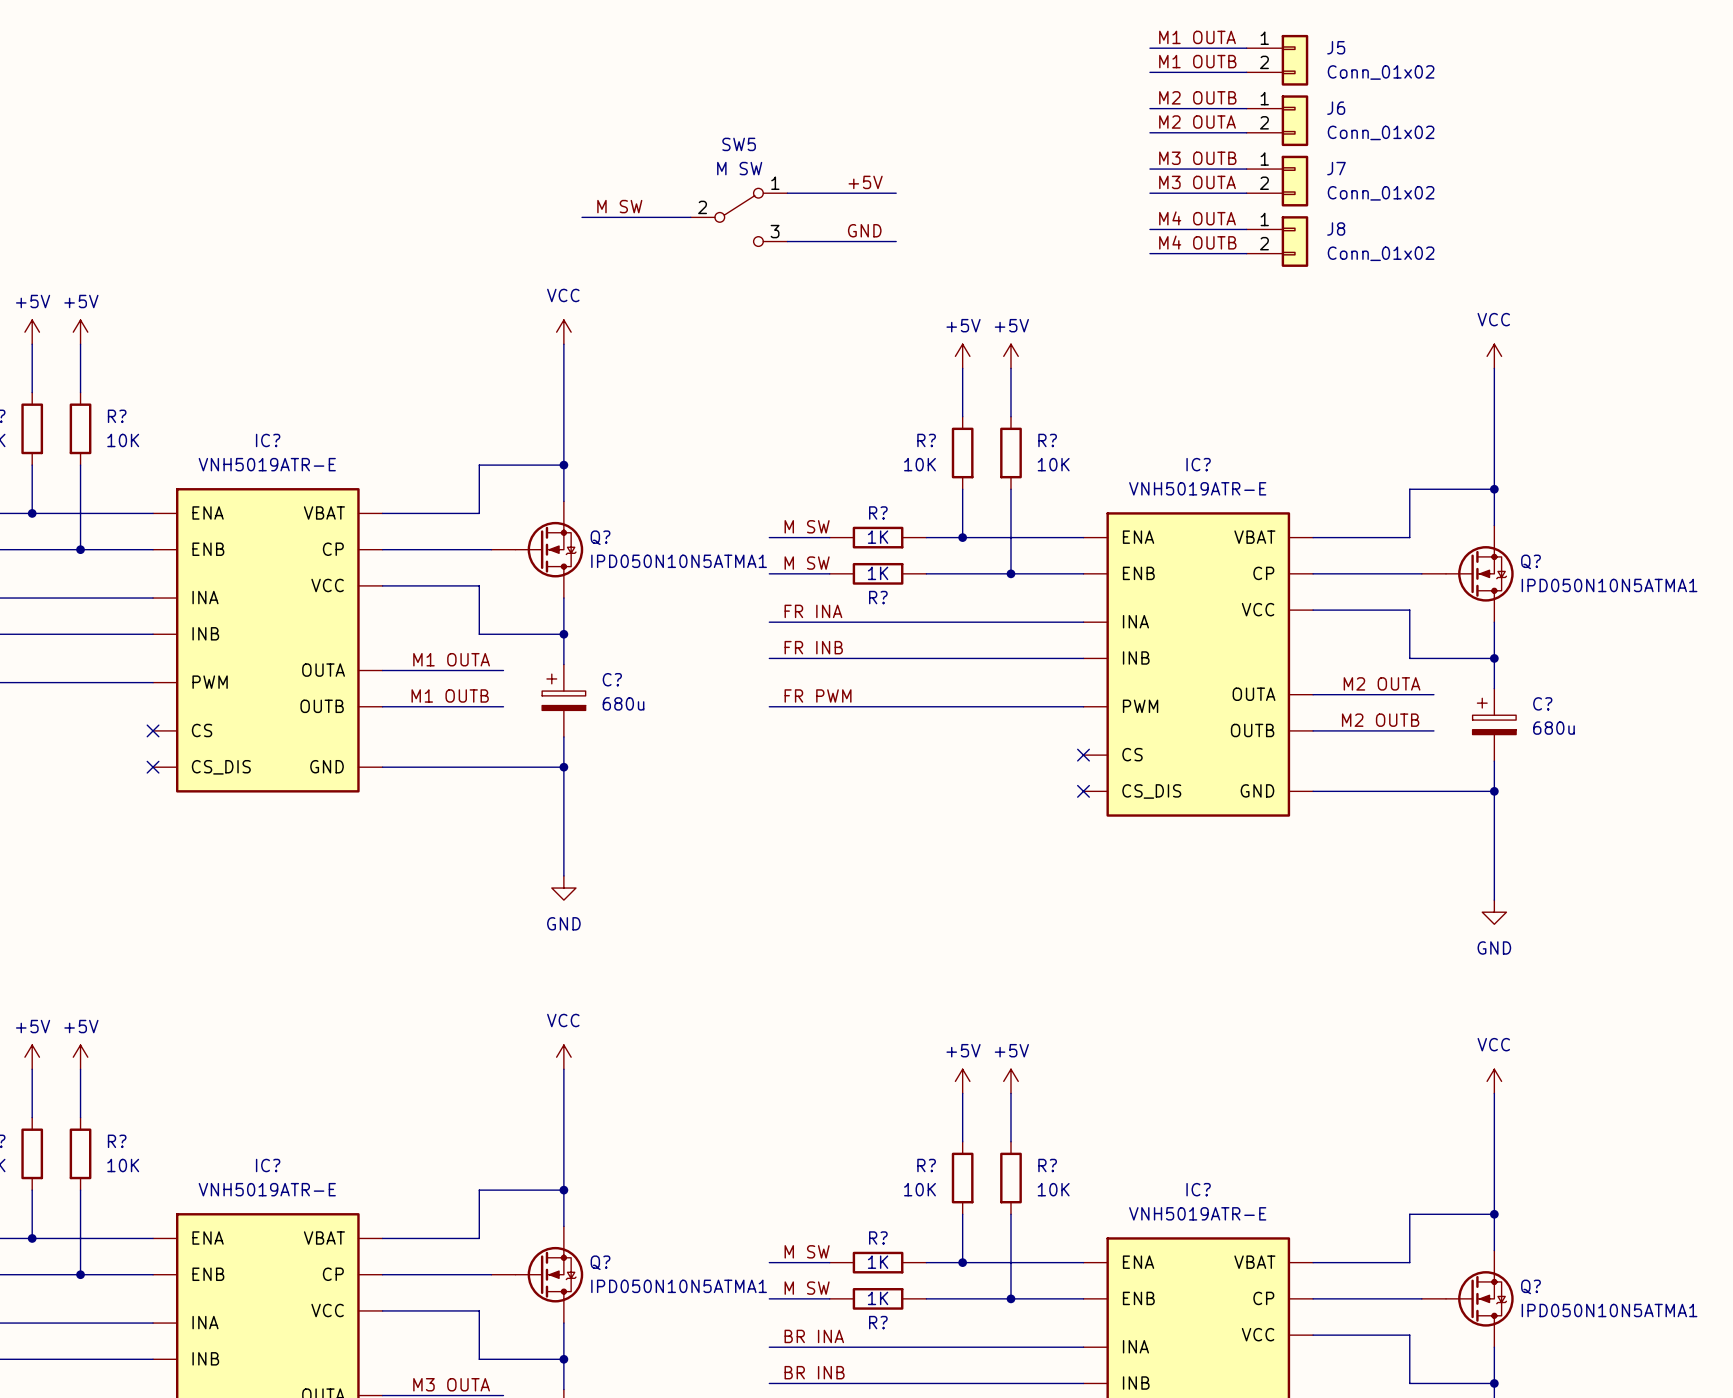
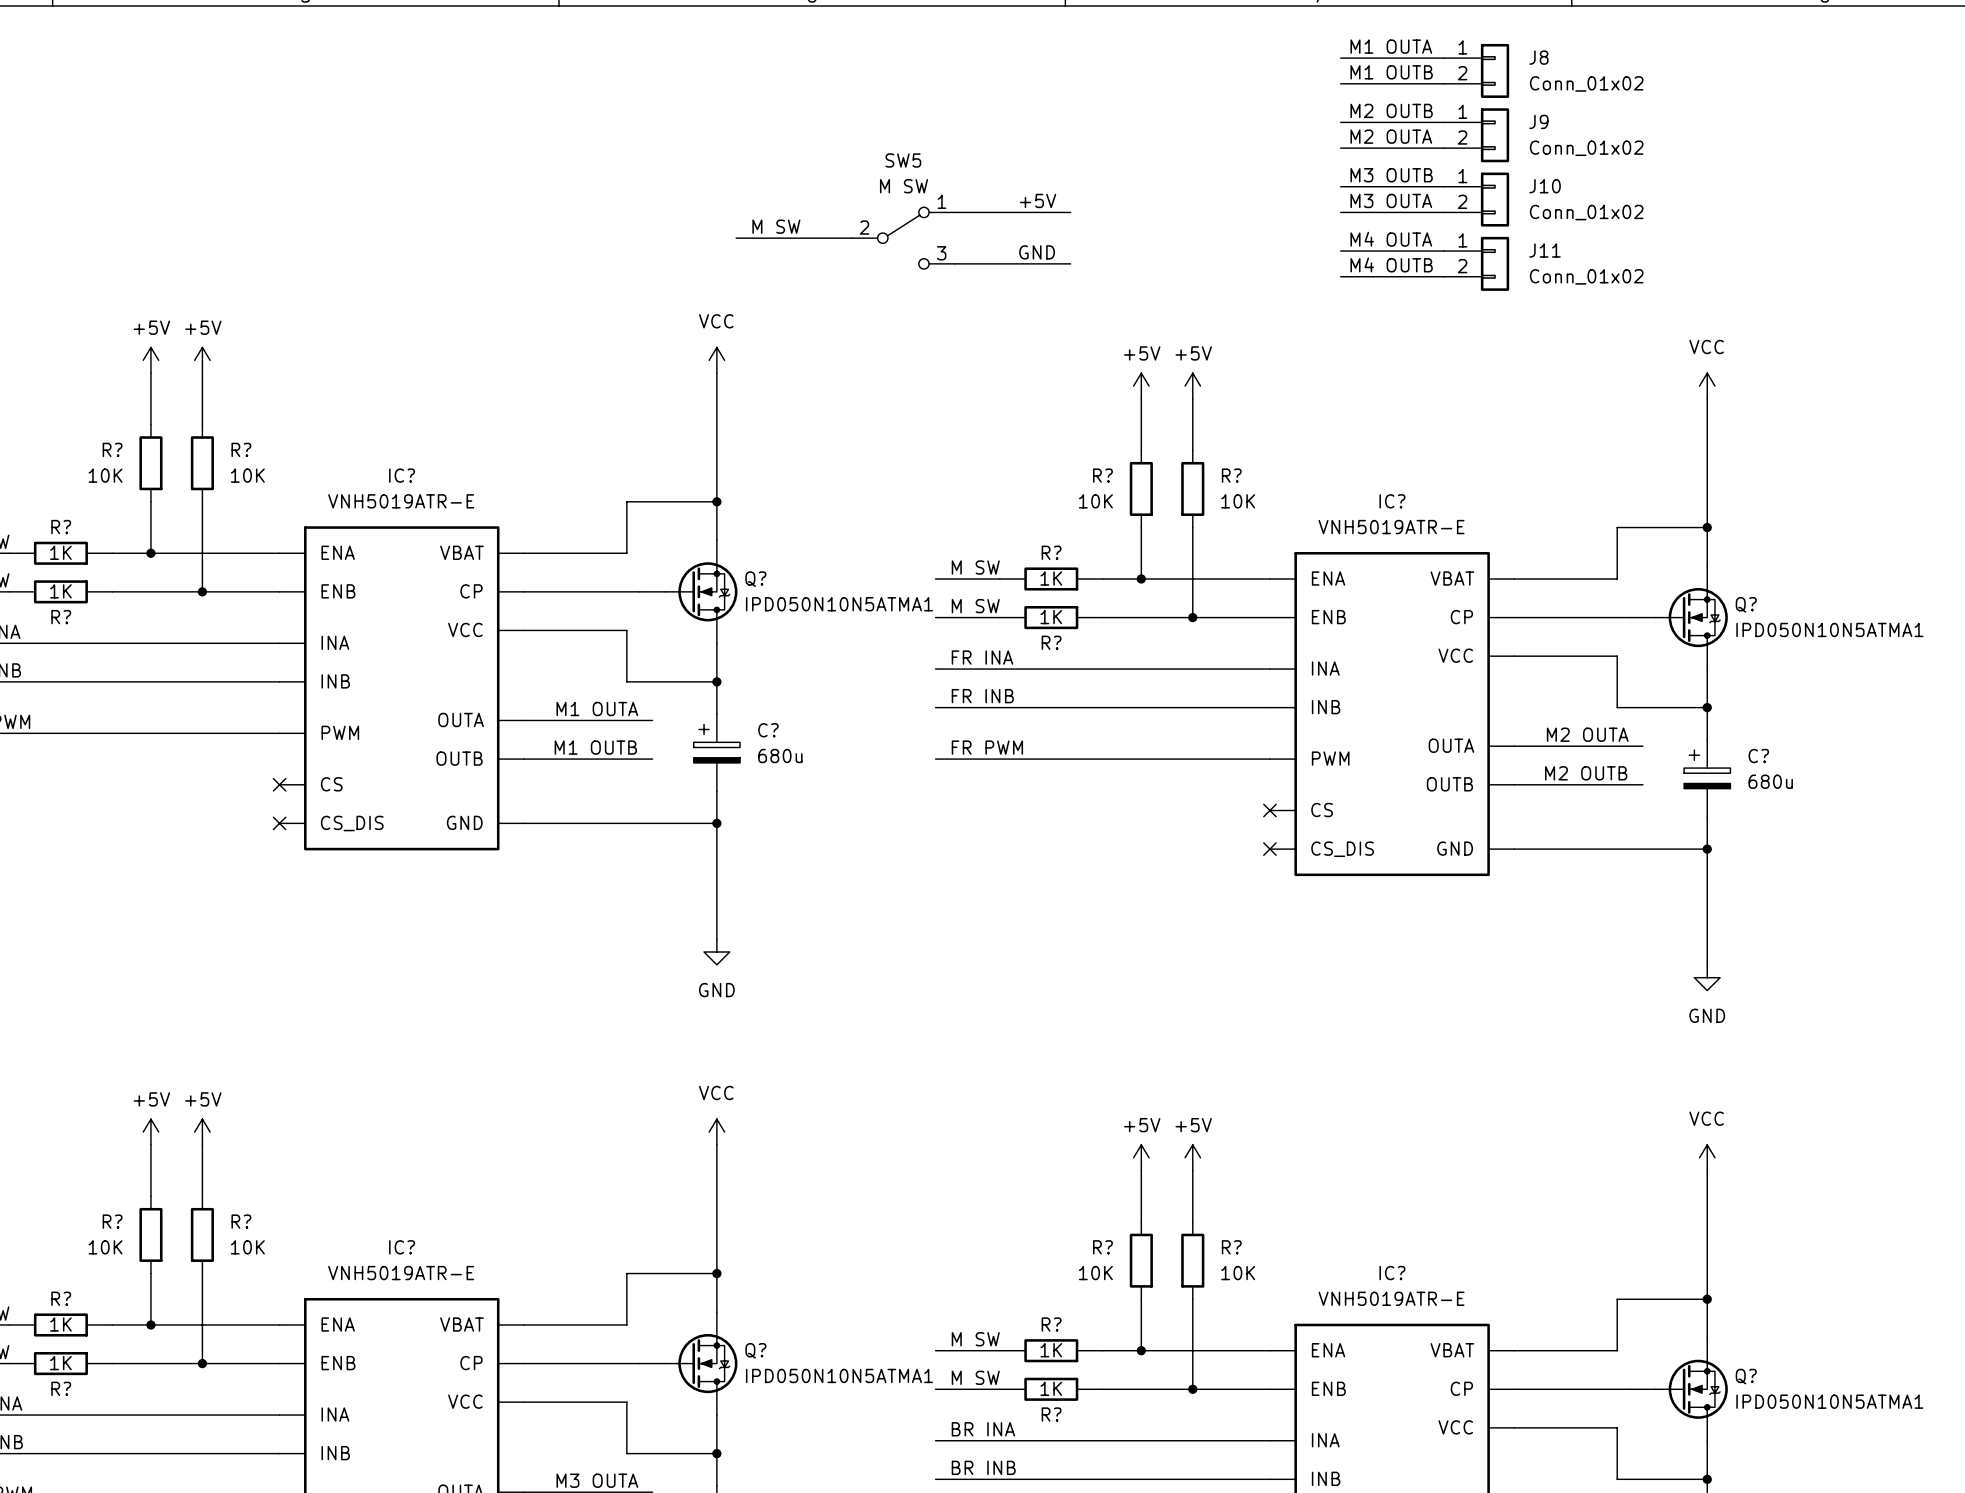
J5 name: J5 (1336, 47) -> J8 (1538, 57)
J6 name: J6 (1336, 108) -> J9 (1538, 121)
J7 name: J7 (1336, 168) -> J10 (1545, 186)
J8 name: J8 (1336, 229) -> J11 (1545, 250)

